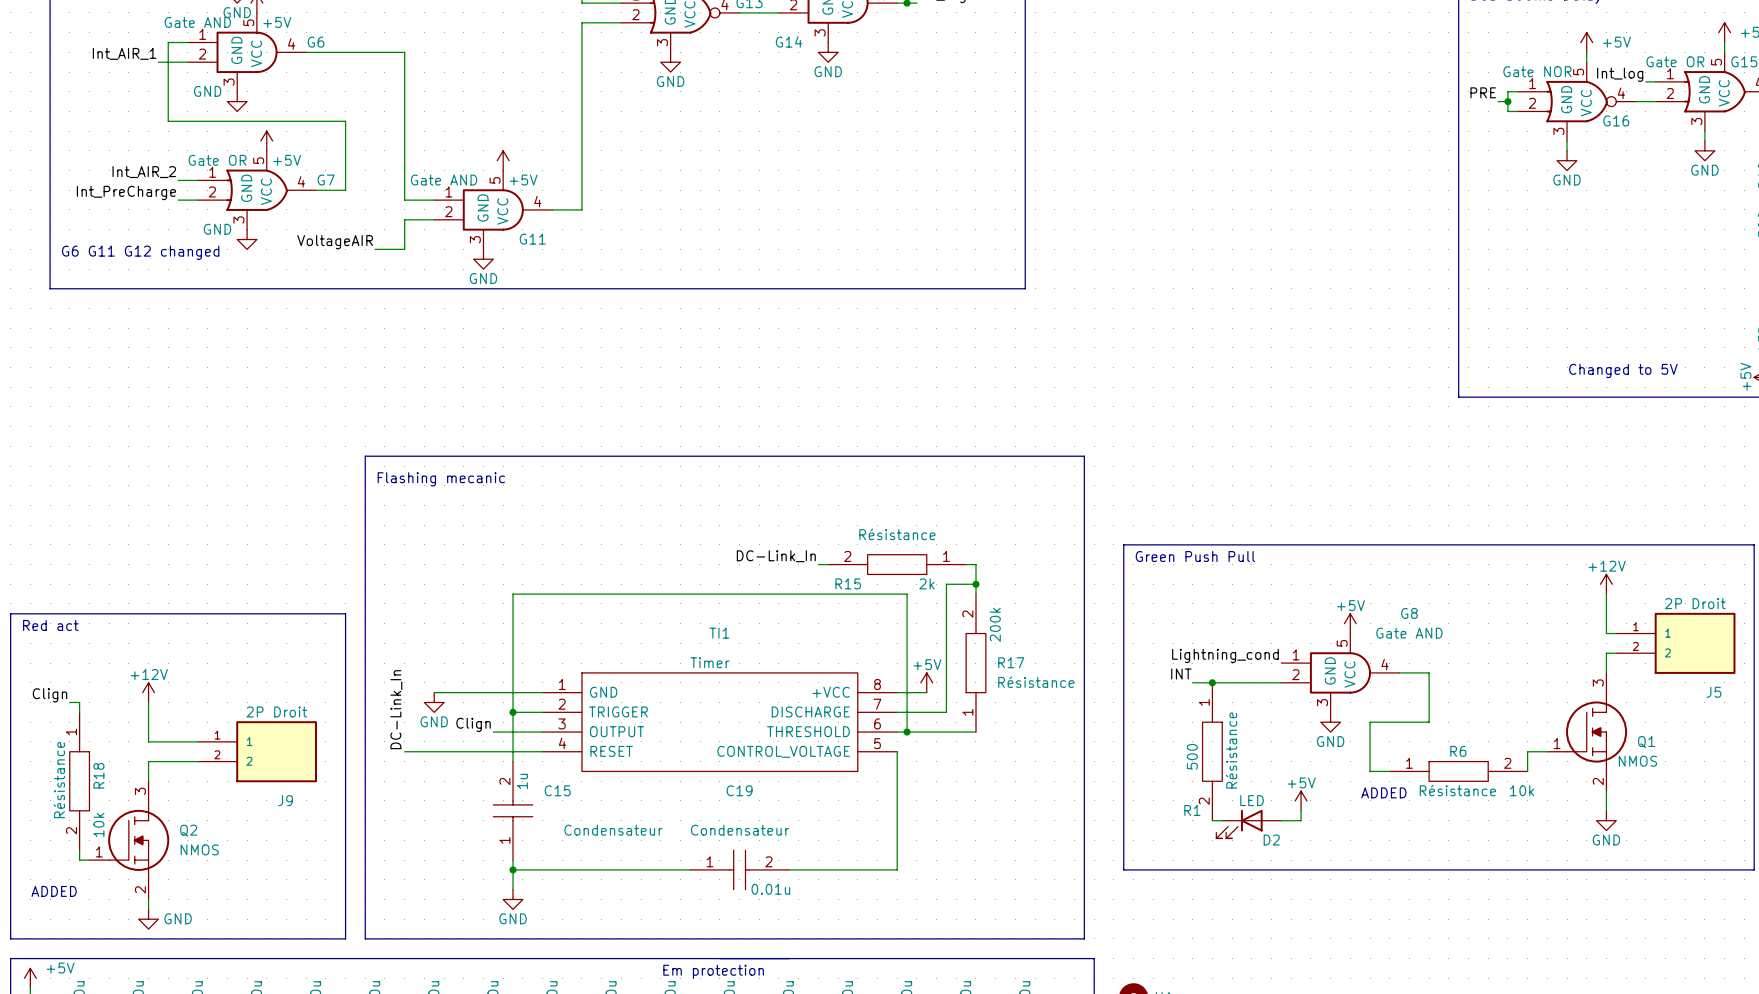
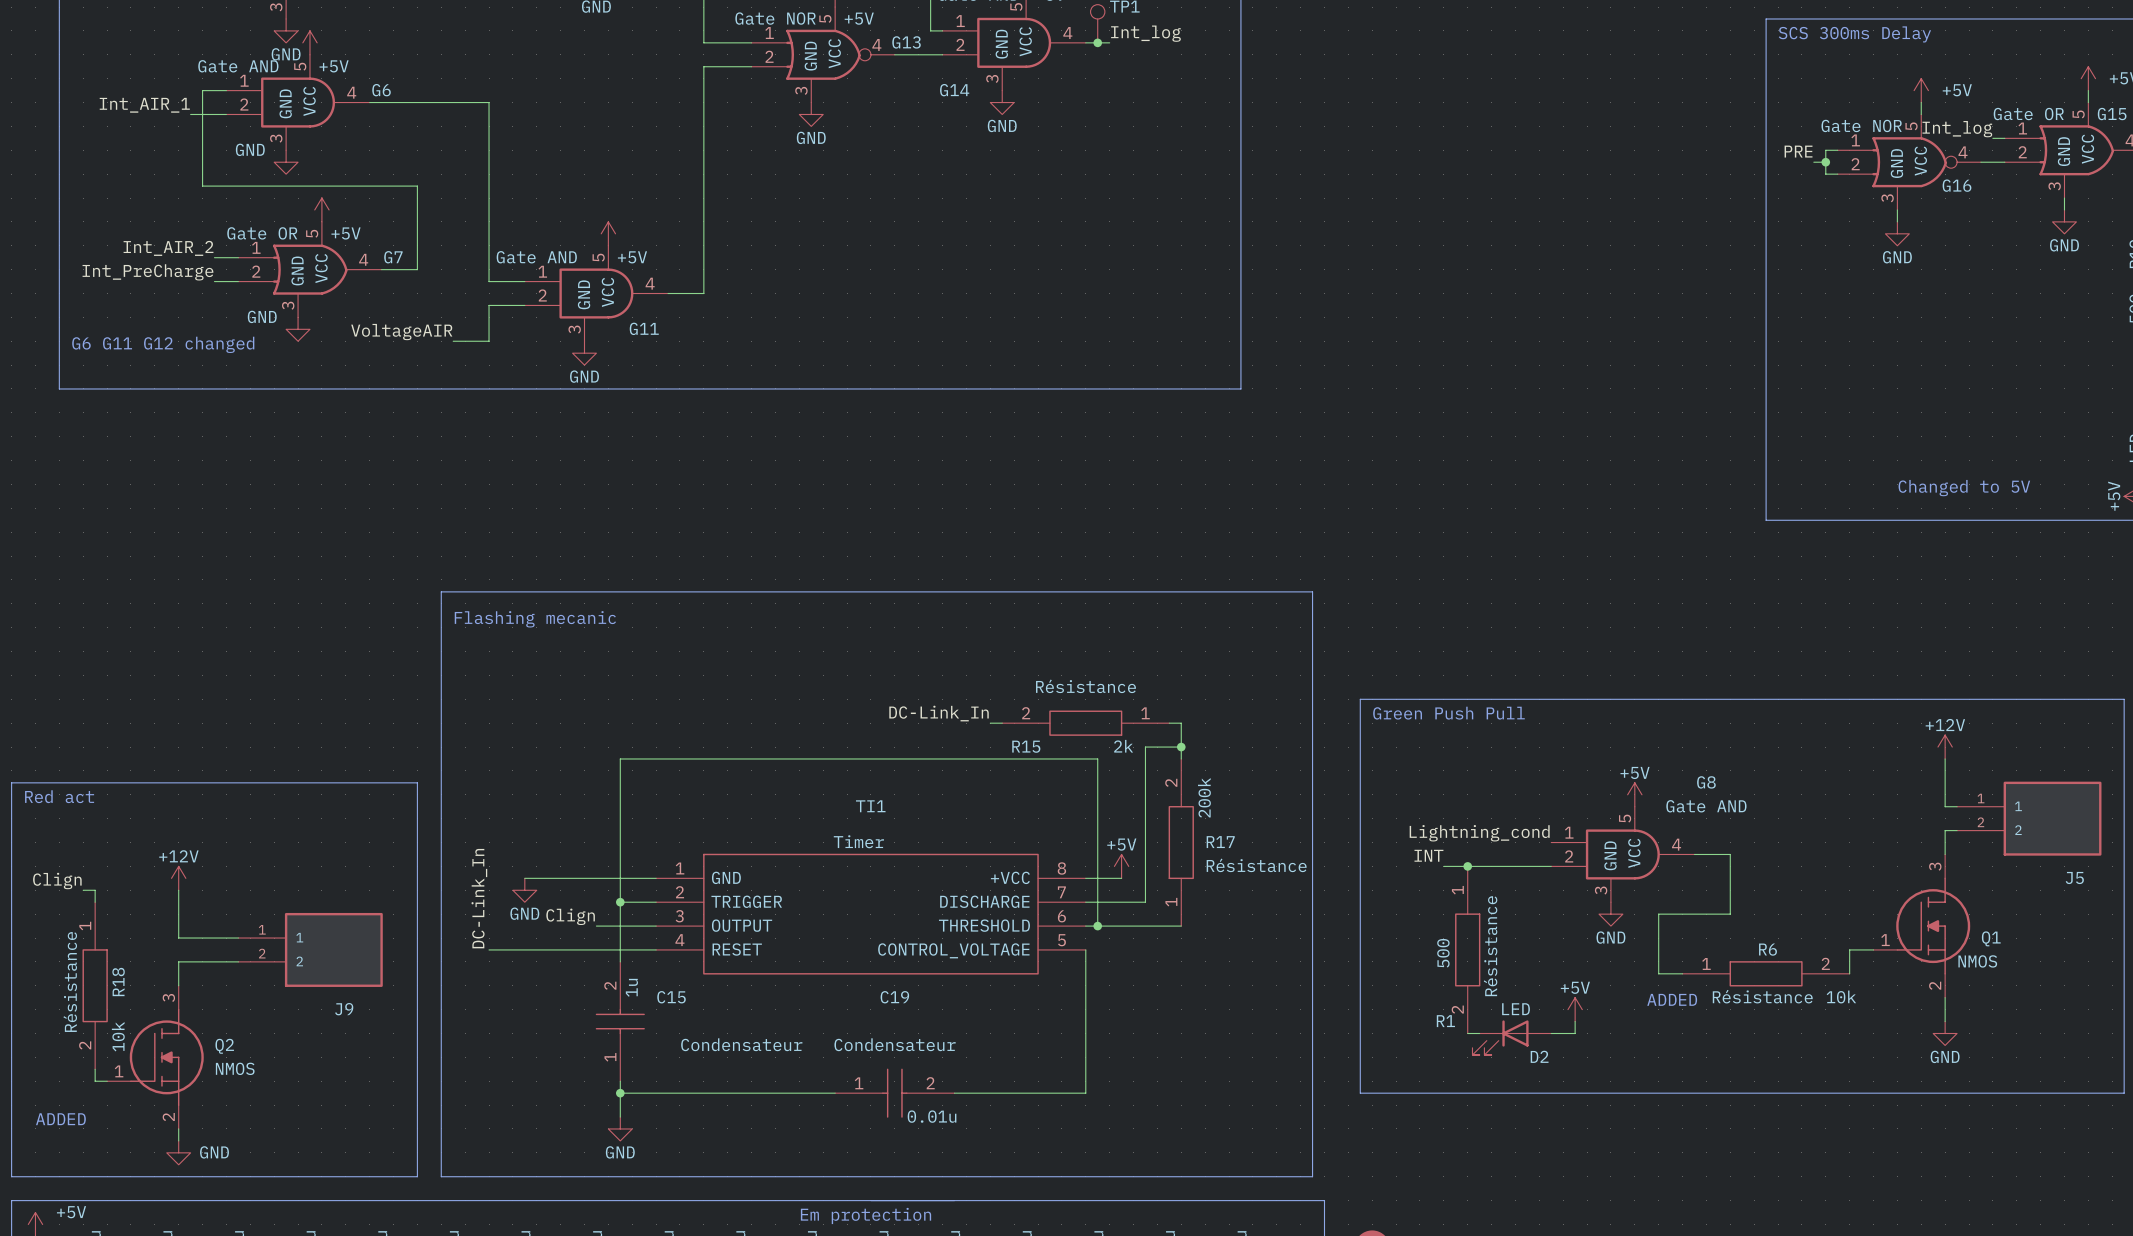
J5 text: 2P Droit (1695, 603) -> none
J9 text: 2P Droit (276, 711) -> none

